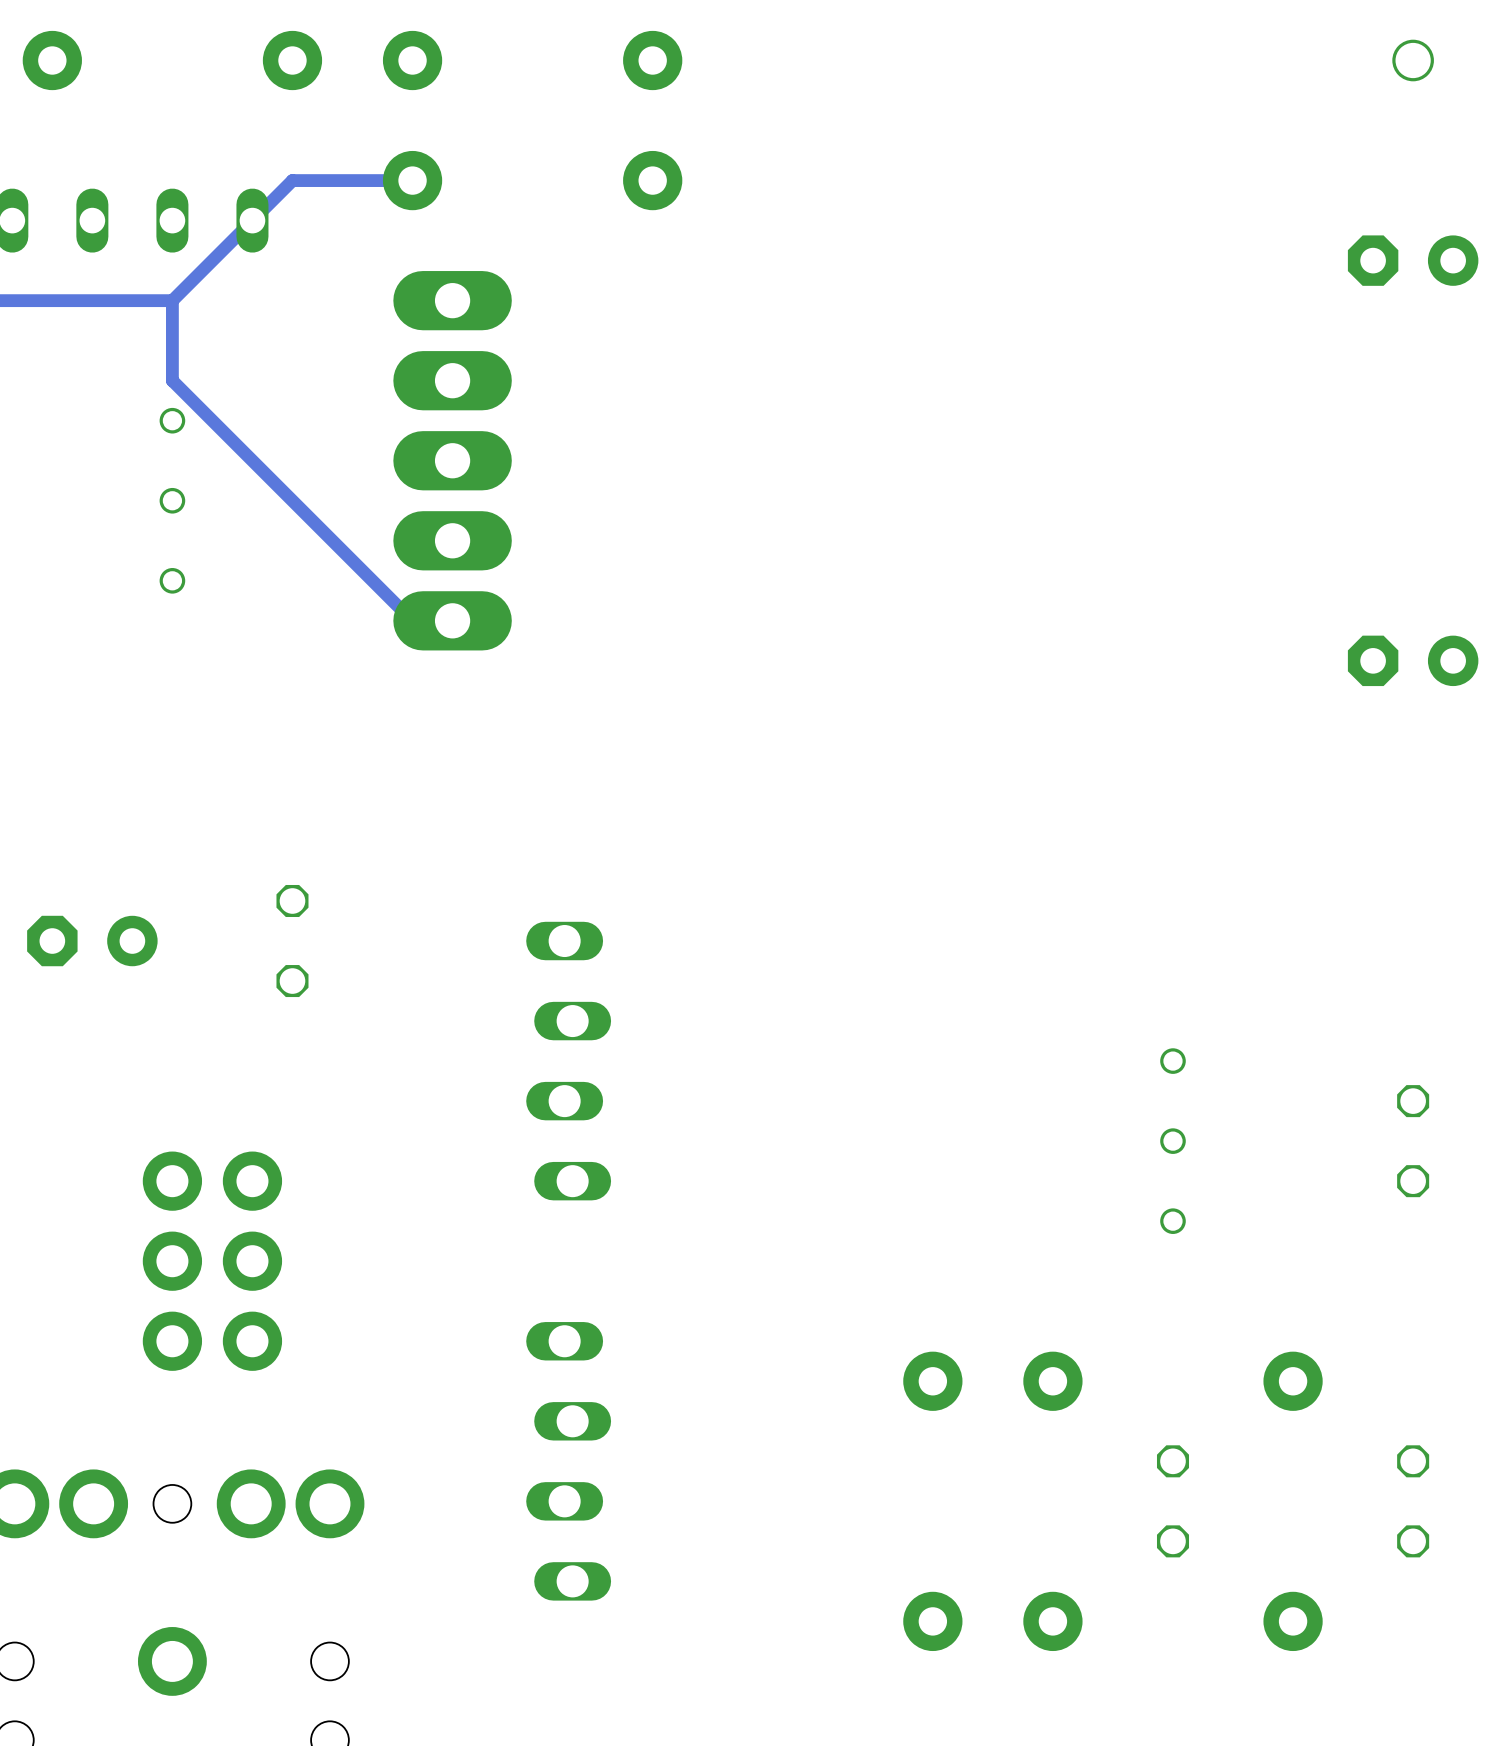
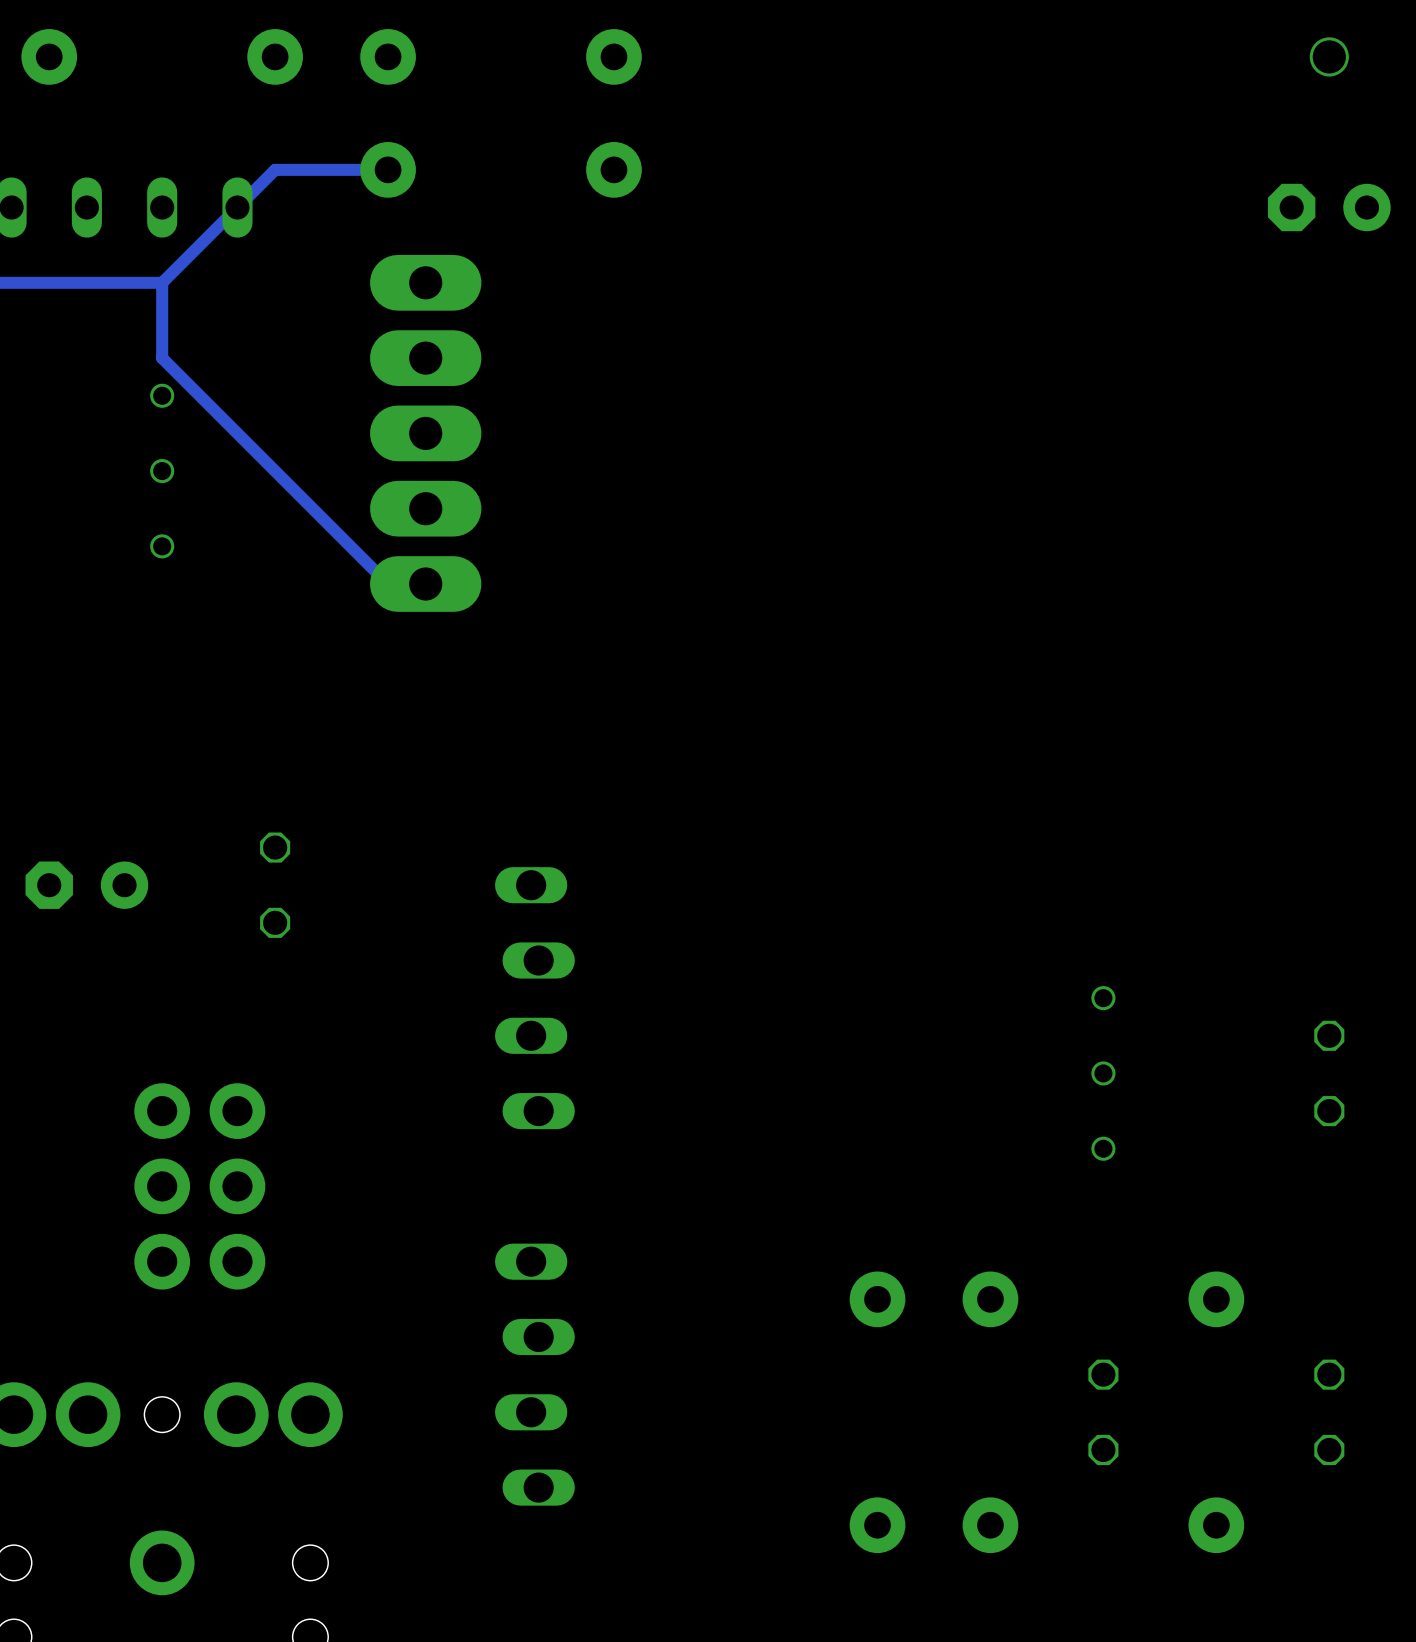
part position: (1413, 260) -> (1329, 207)
part: (1413, 660) -> none

